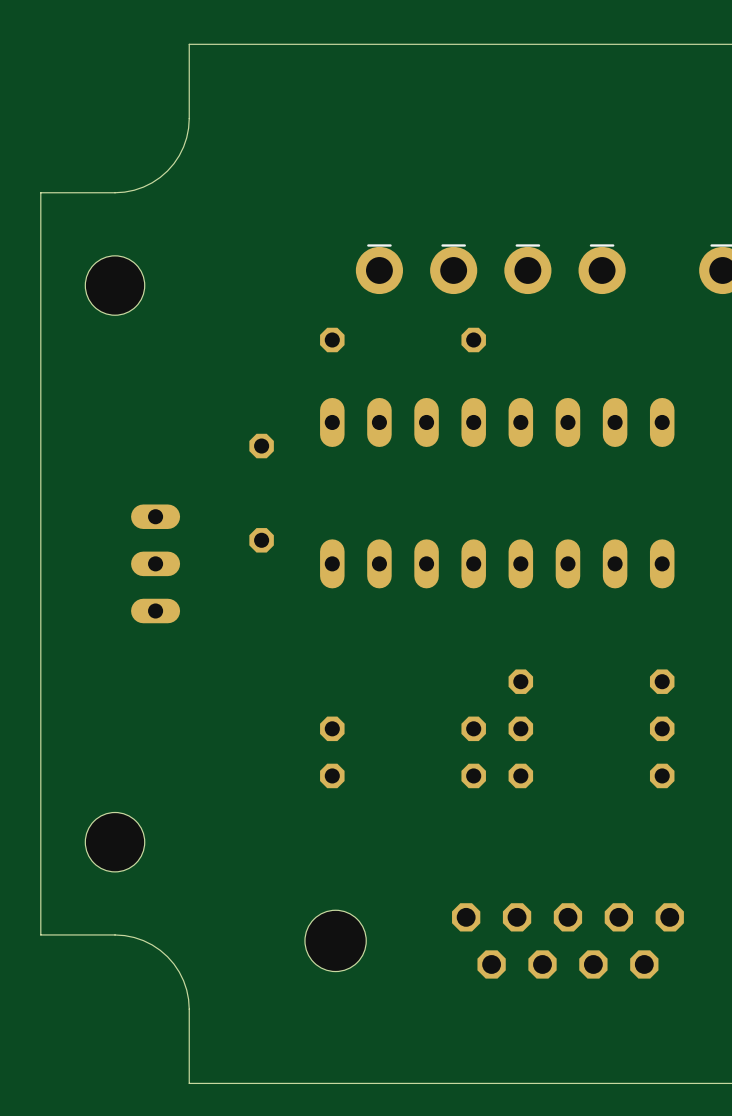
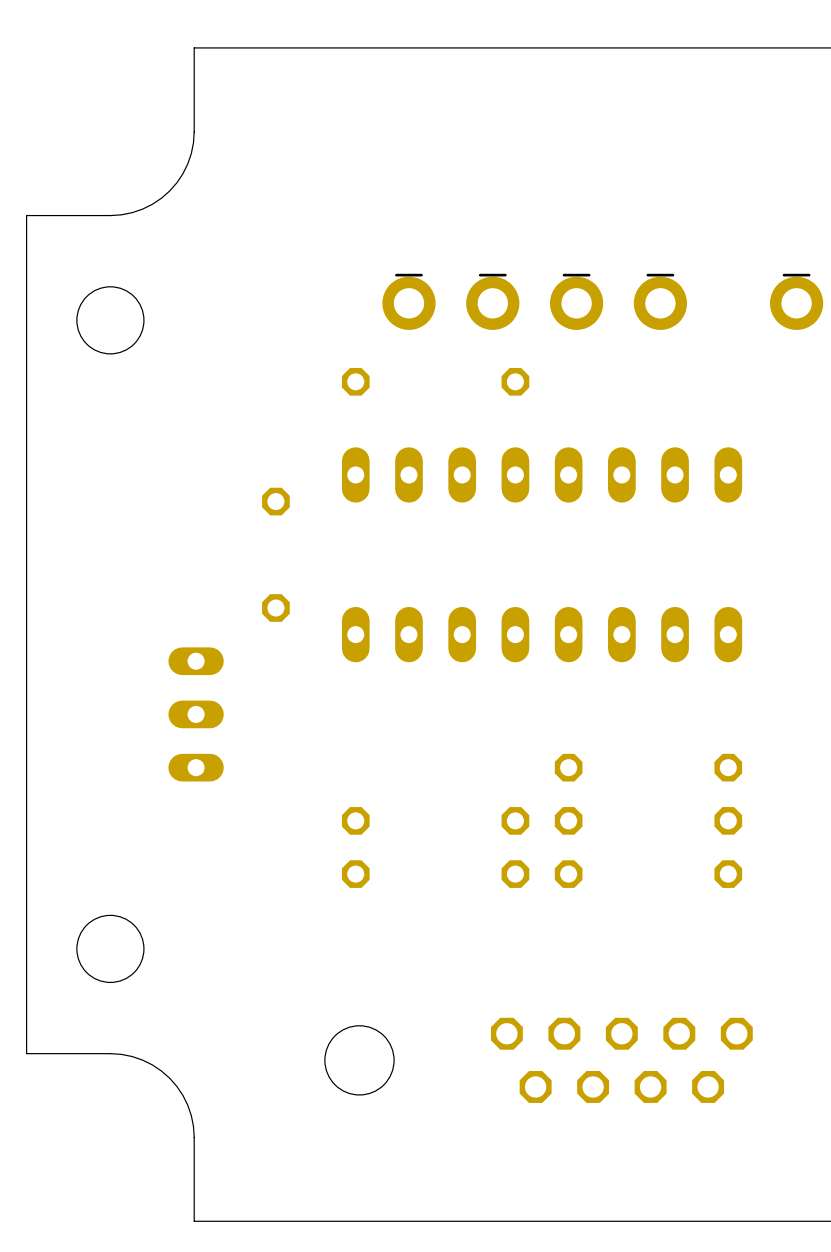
part position: (155, 563) -> (196, 714)

